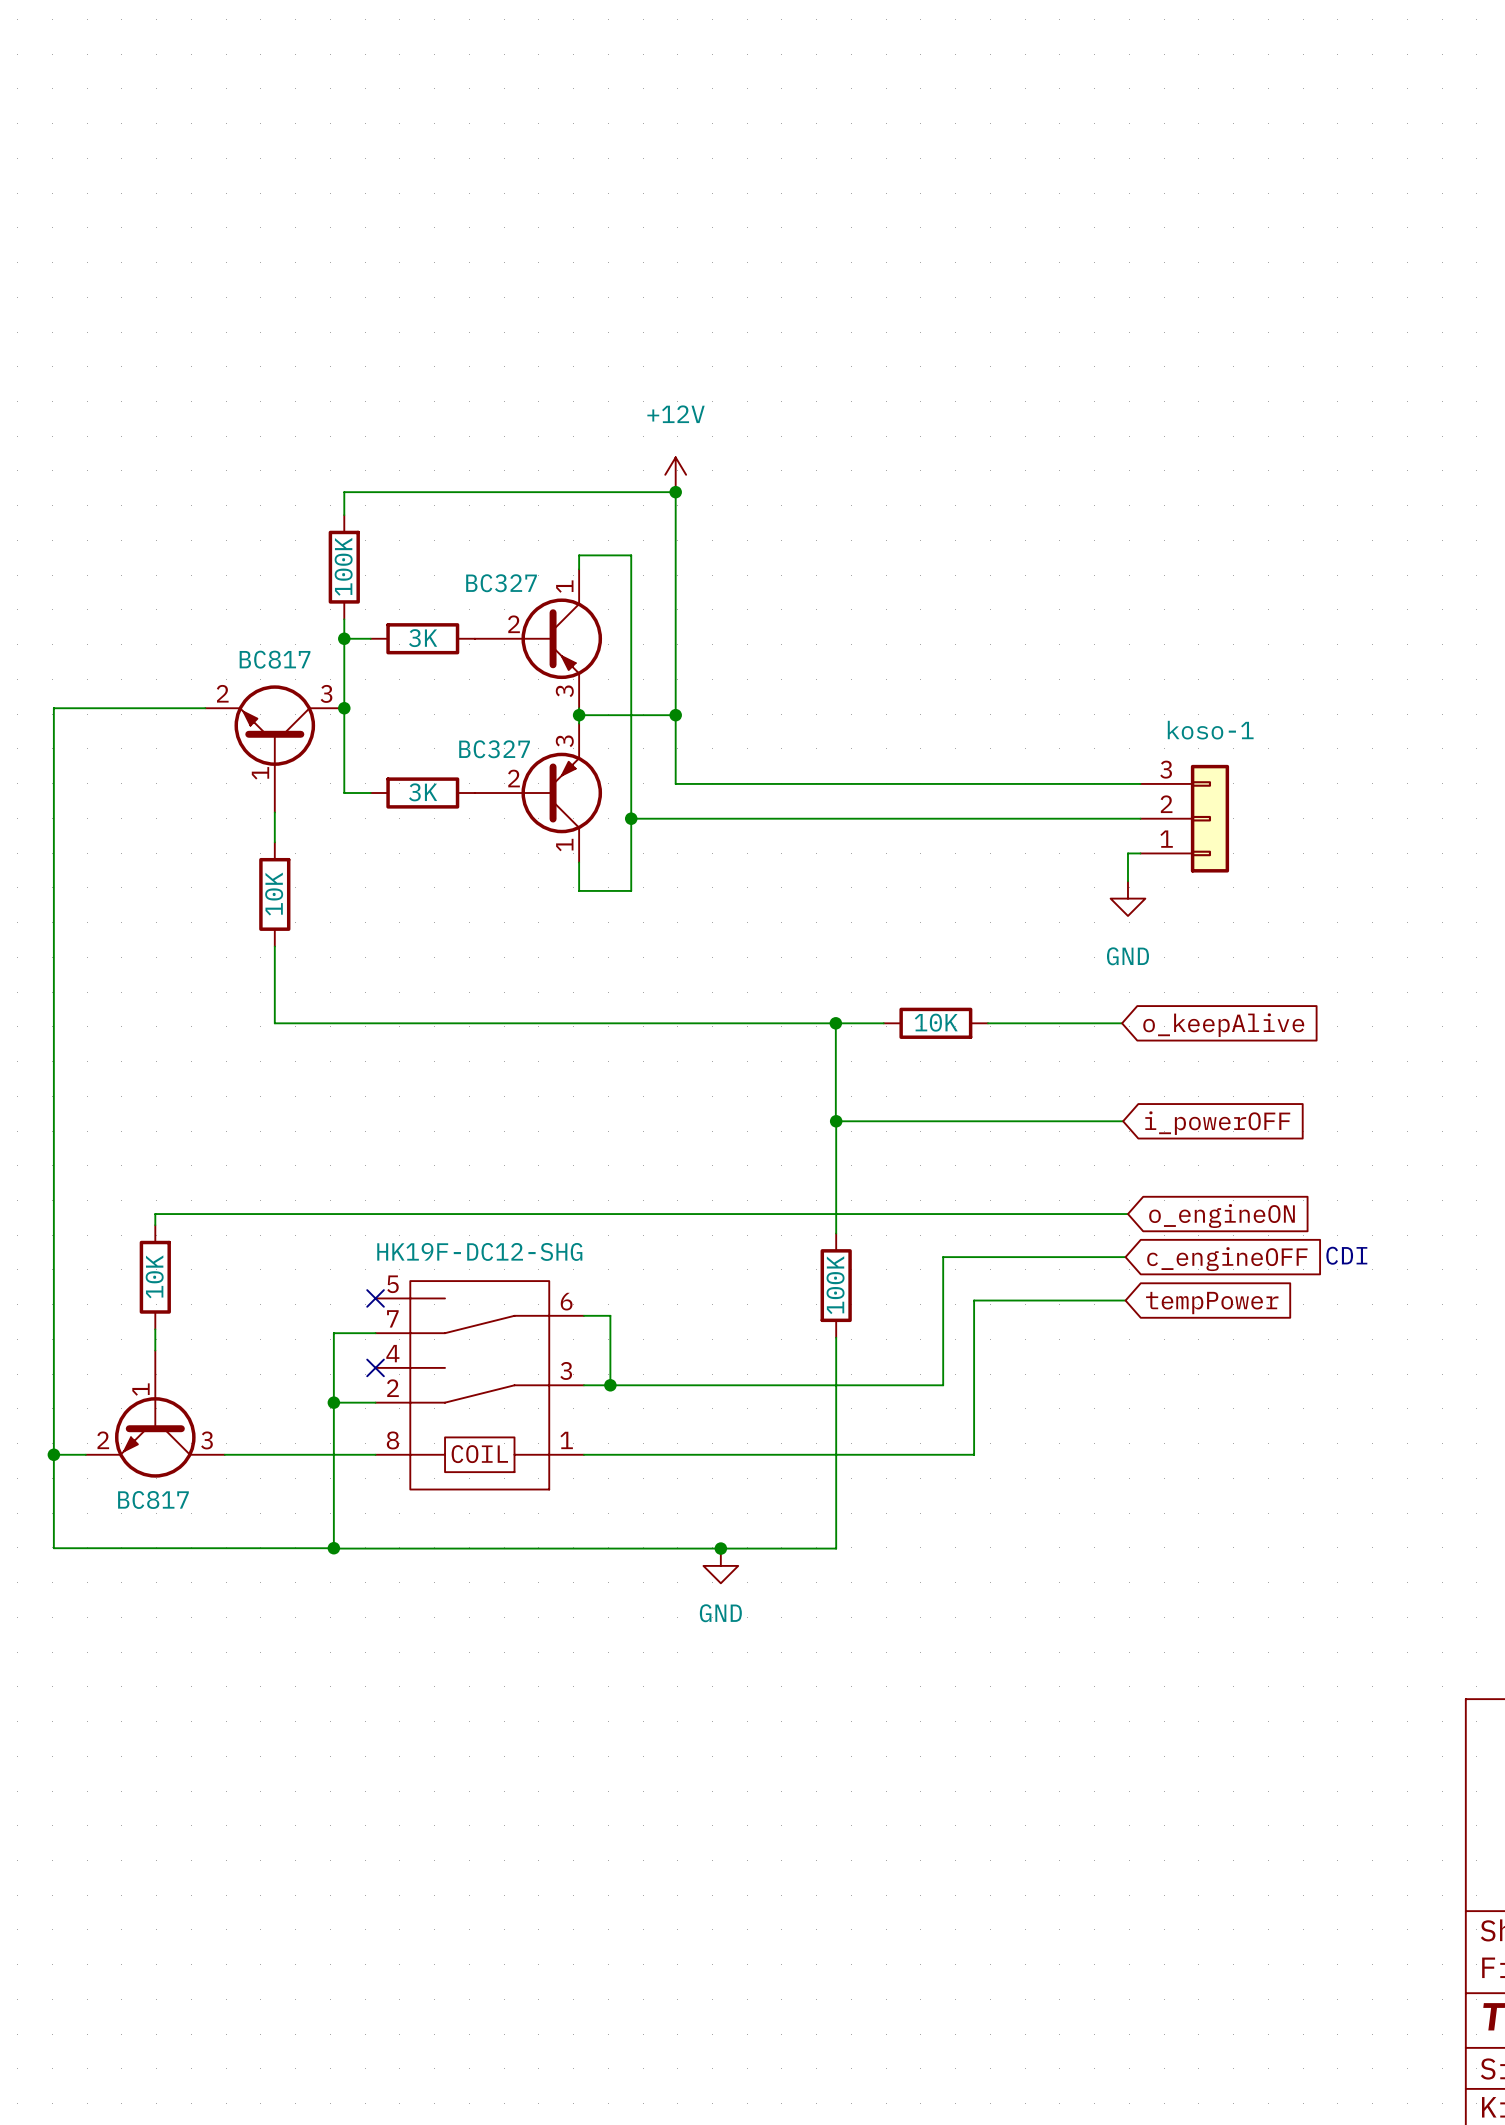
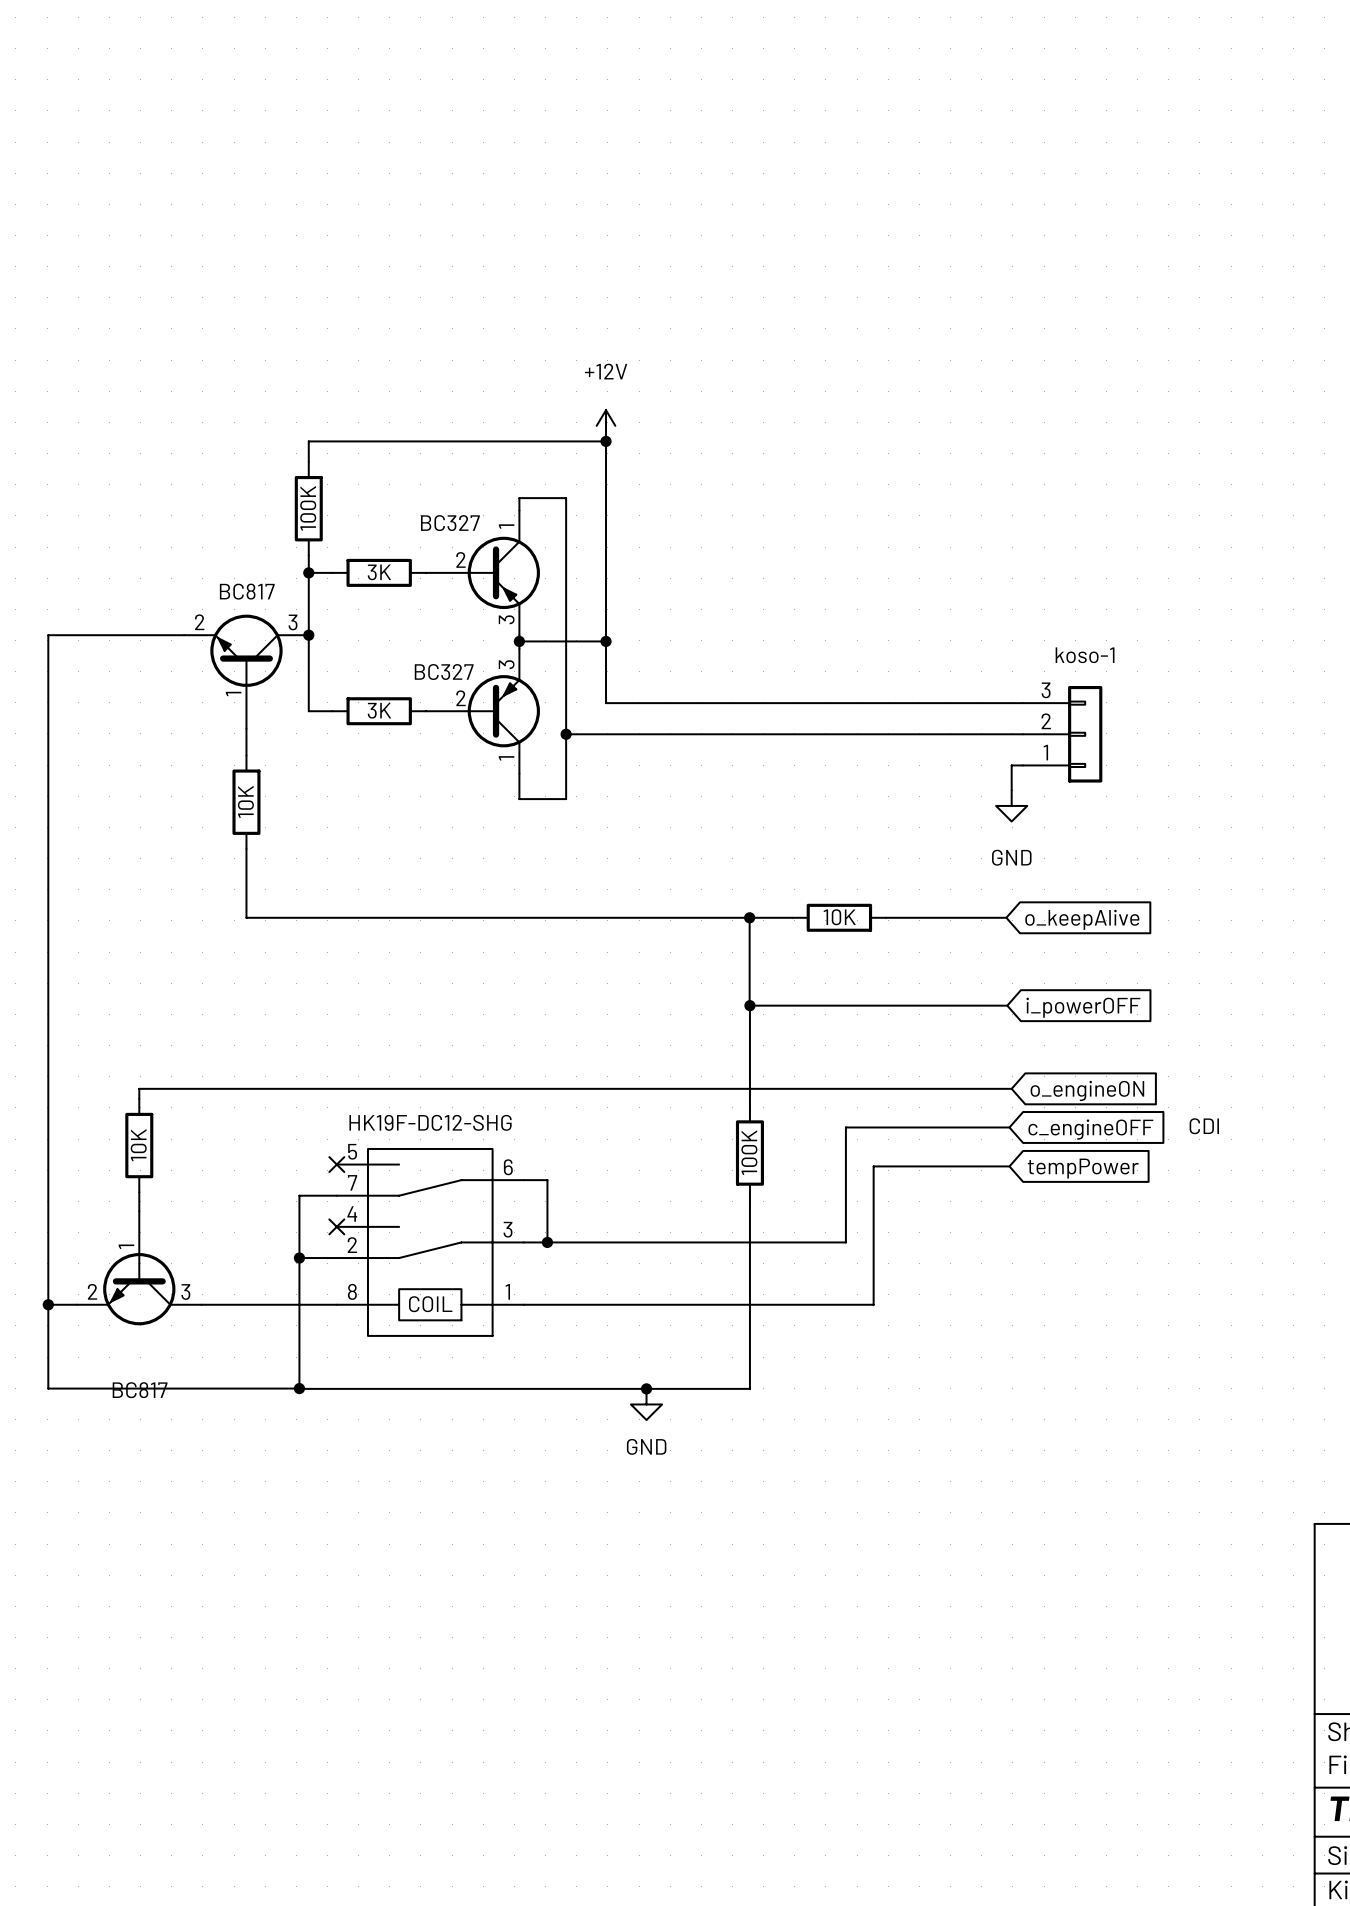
part value position: BC817 (153, 1499) -> BC817 (140, 1390)

